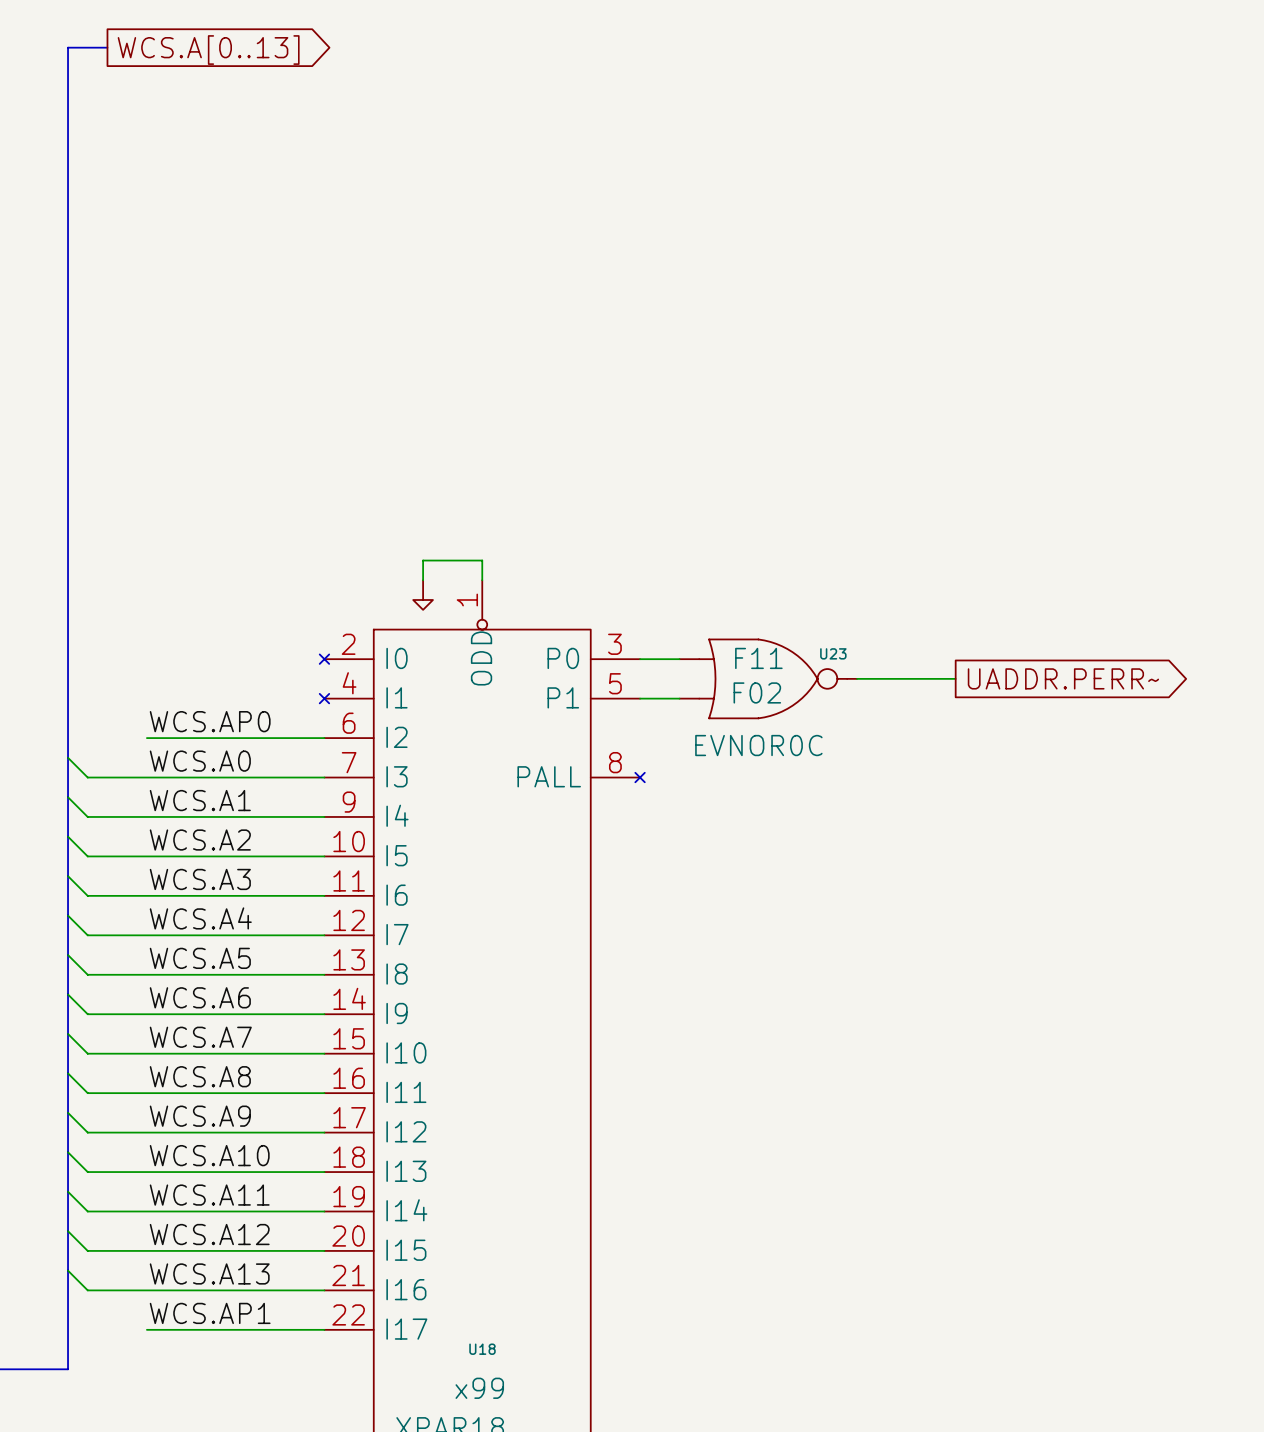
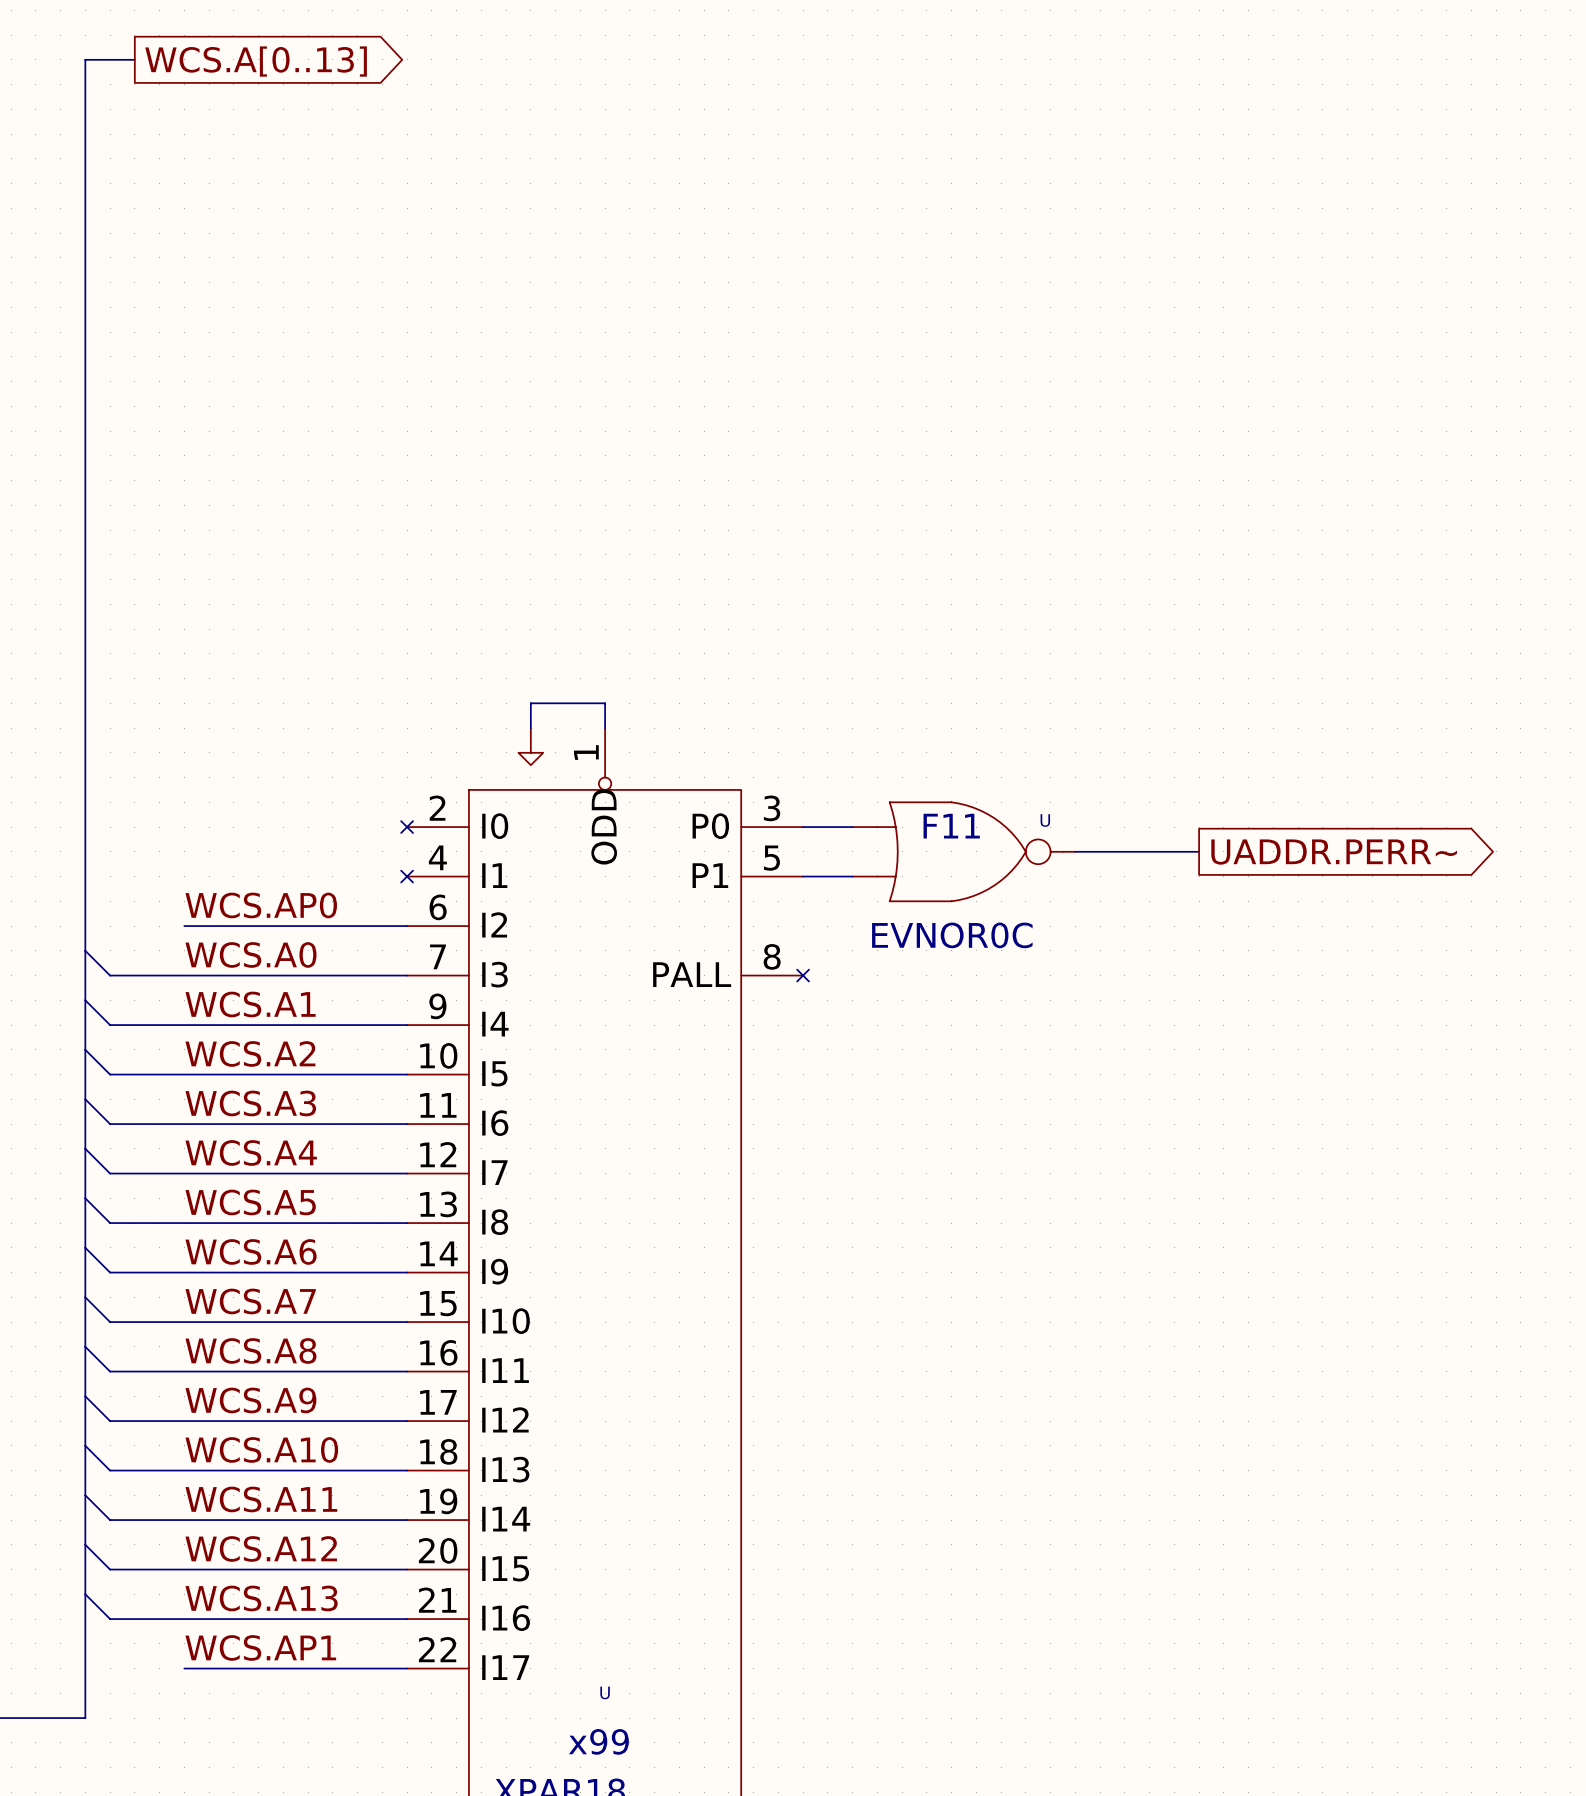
U23 name: U23 (833, 653) -> U (1045, 820)
U23 value: F02 (757, 692) -> none
U18 name: U18 (482, 1349) -> U (605, 1692)

